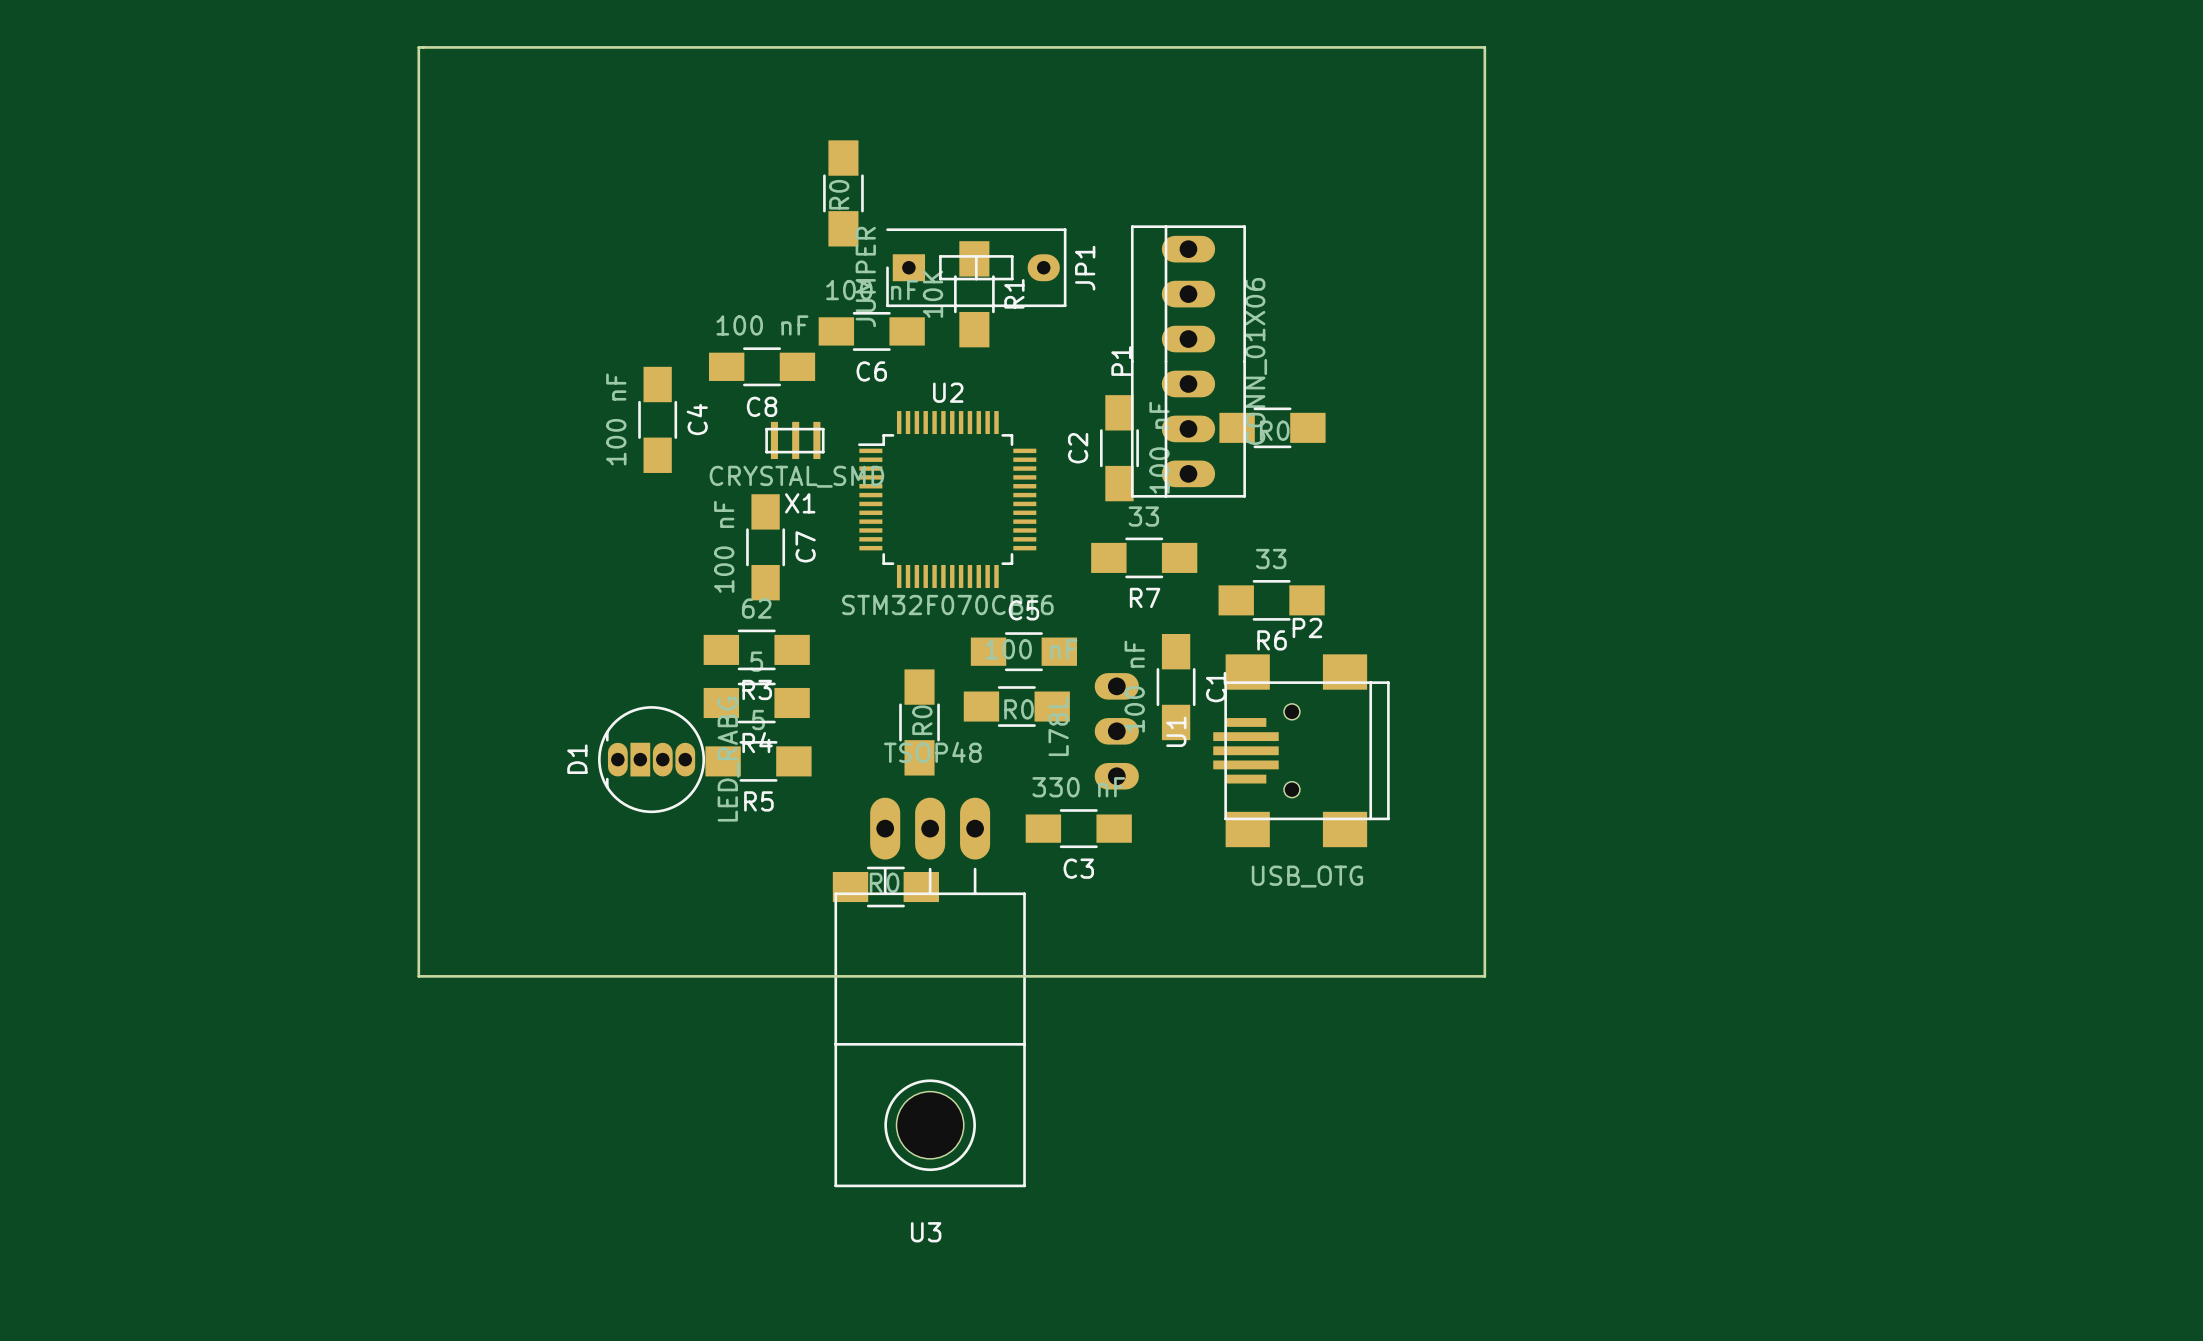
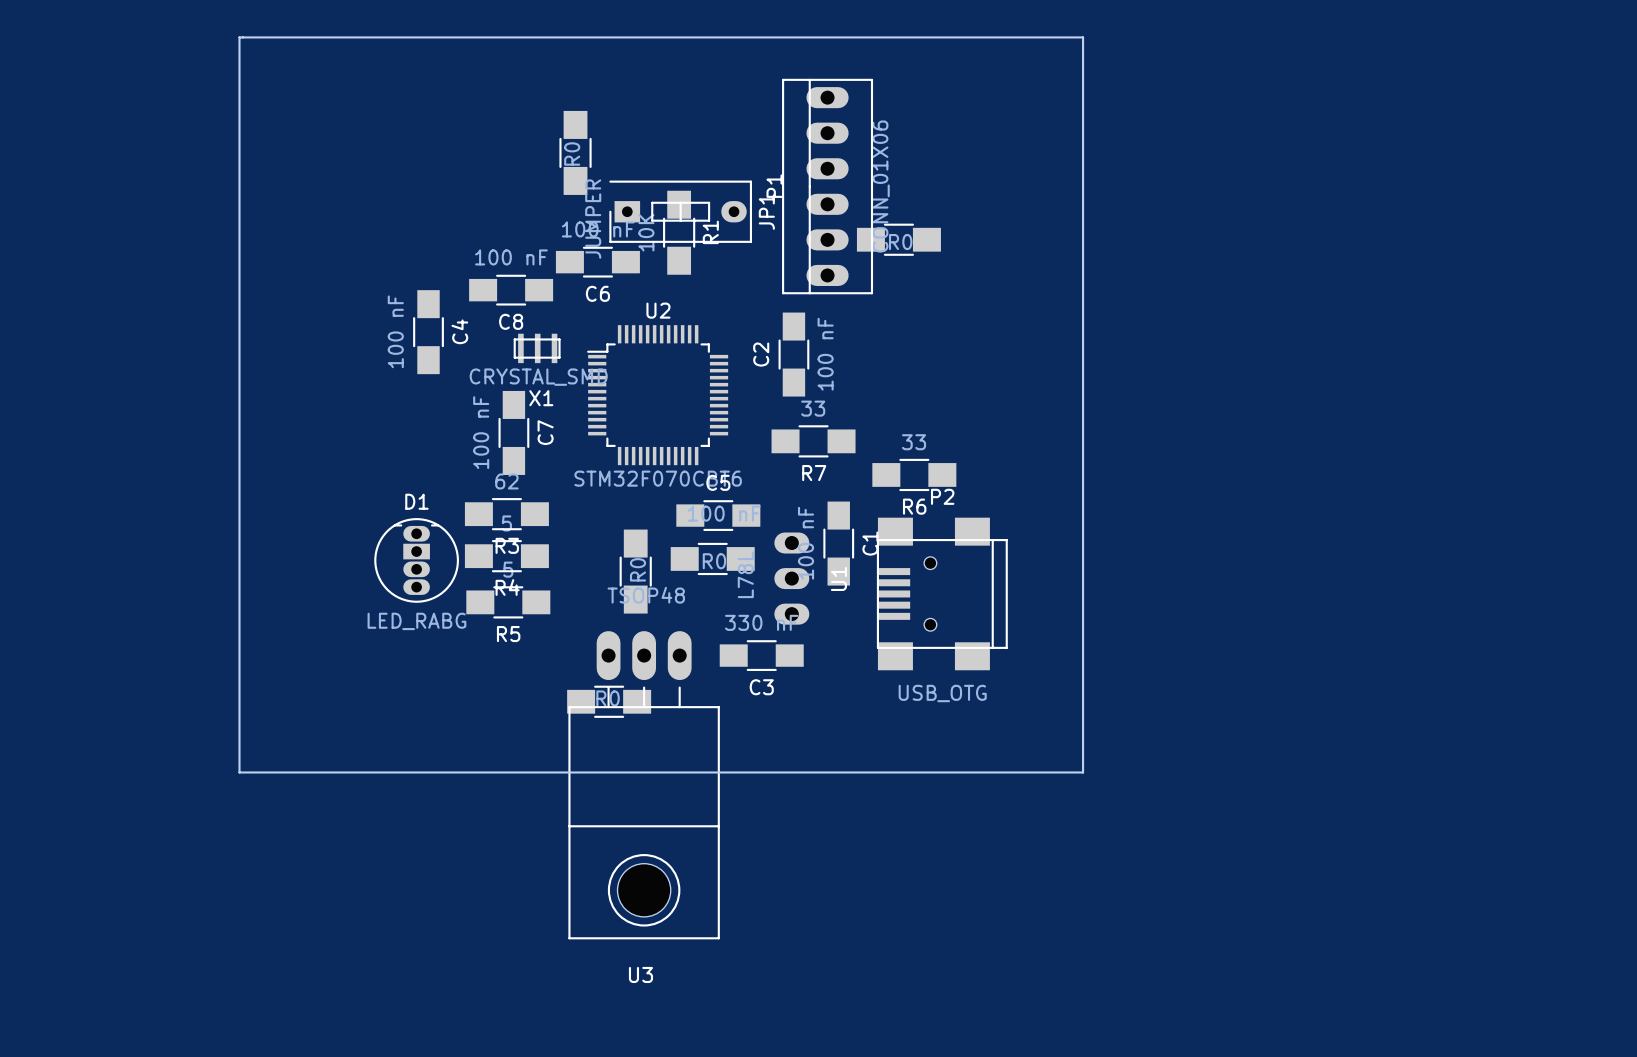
P1 position: (1188, 361) -> (827, 186)
part position: (1272, 427) -> (898, 239)
P2 footprint: [1213, 654, 1390, 848] -> [876, 517, 1008, 671]
D1 rotation: 0° (651, 759) -> 90° clockwise (416, 560)

